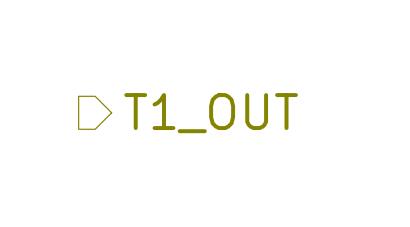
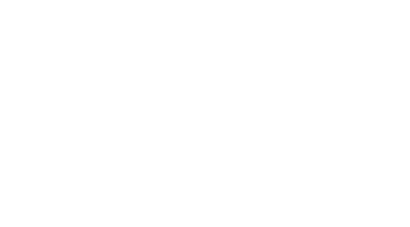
hierarchical label: T1_OUT (211, 113) -> none

